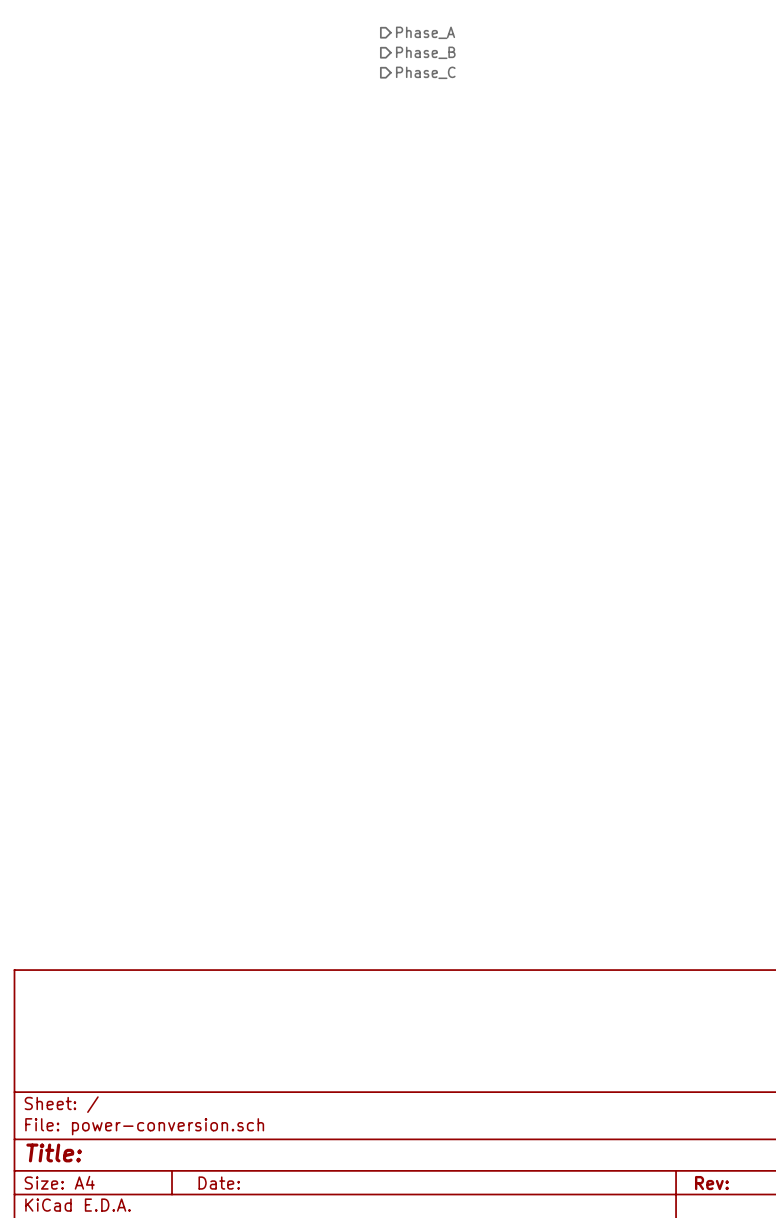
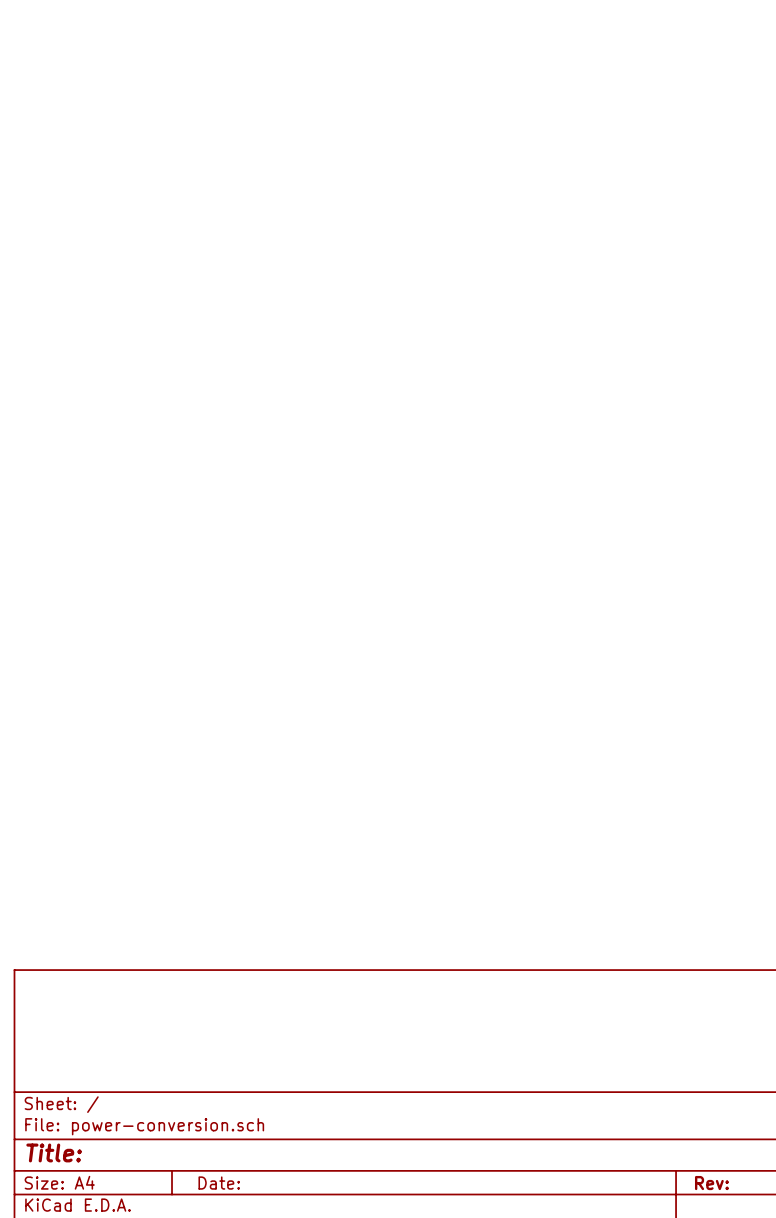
hierarchical label: Phase_A (425, 32) -> none
hierarchical label: Phase_B (425, 52) -> none
hierarchical label: Phase_C (425, 72) -> none

